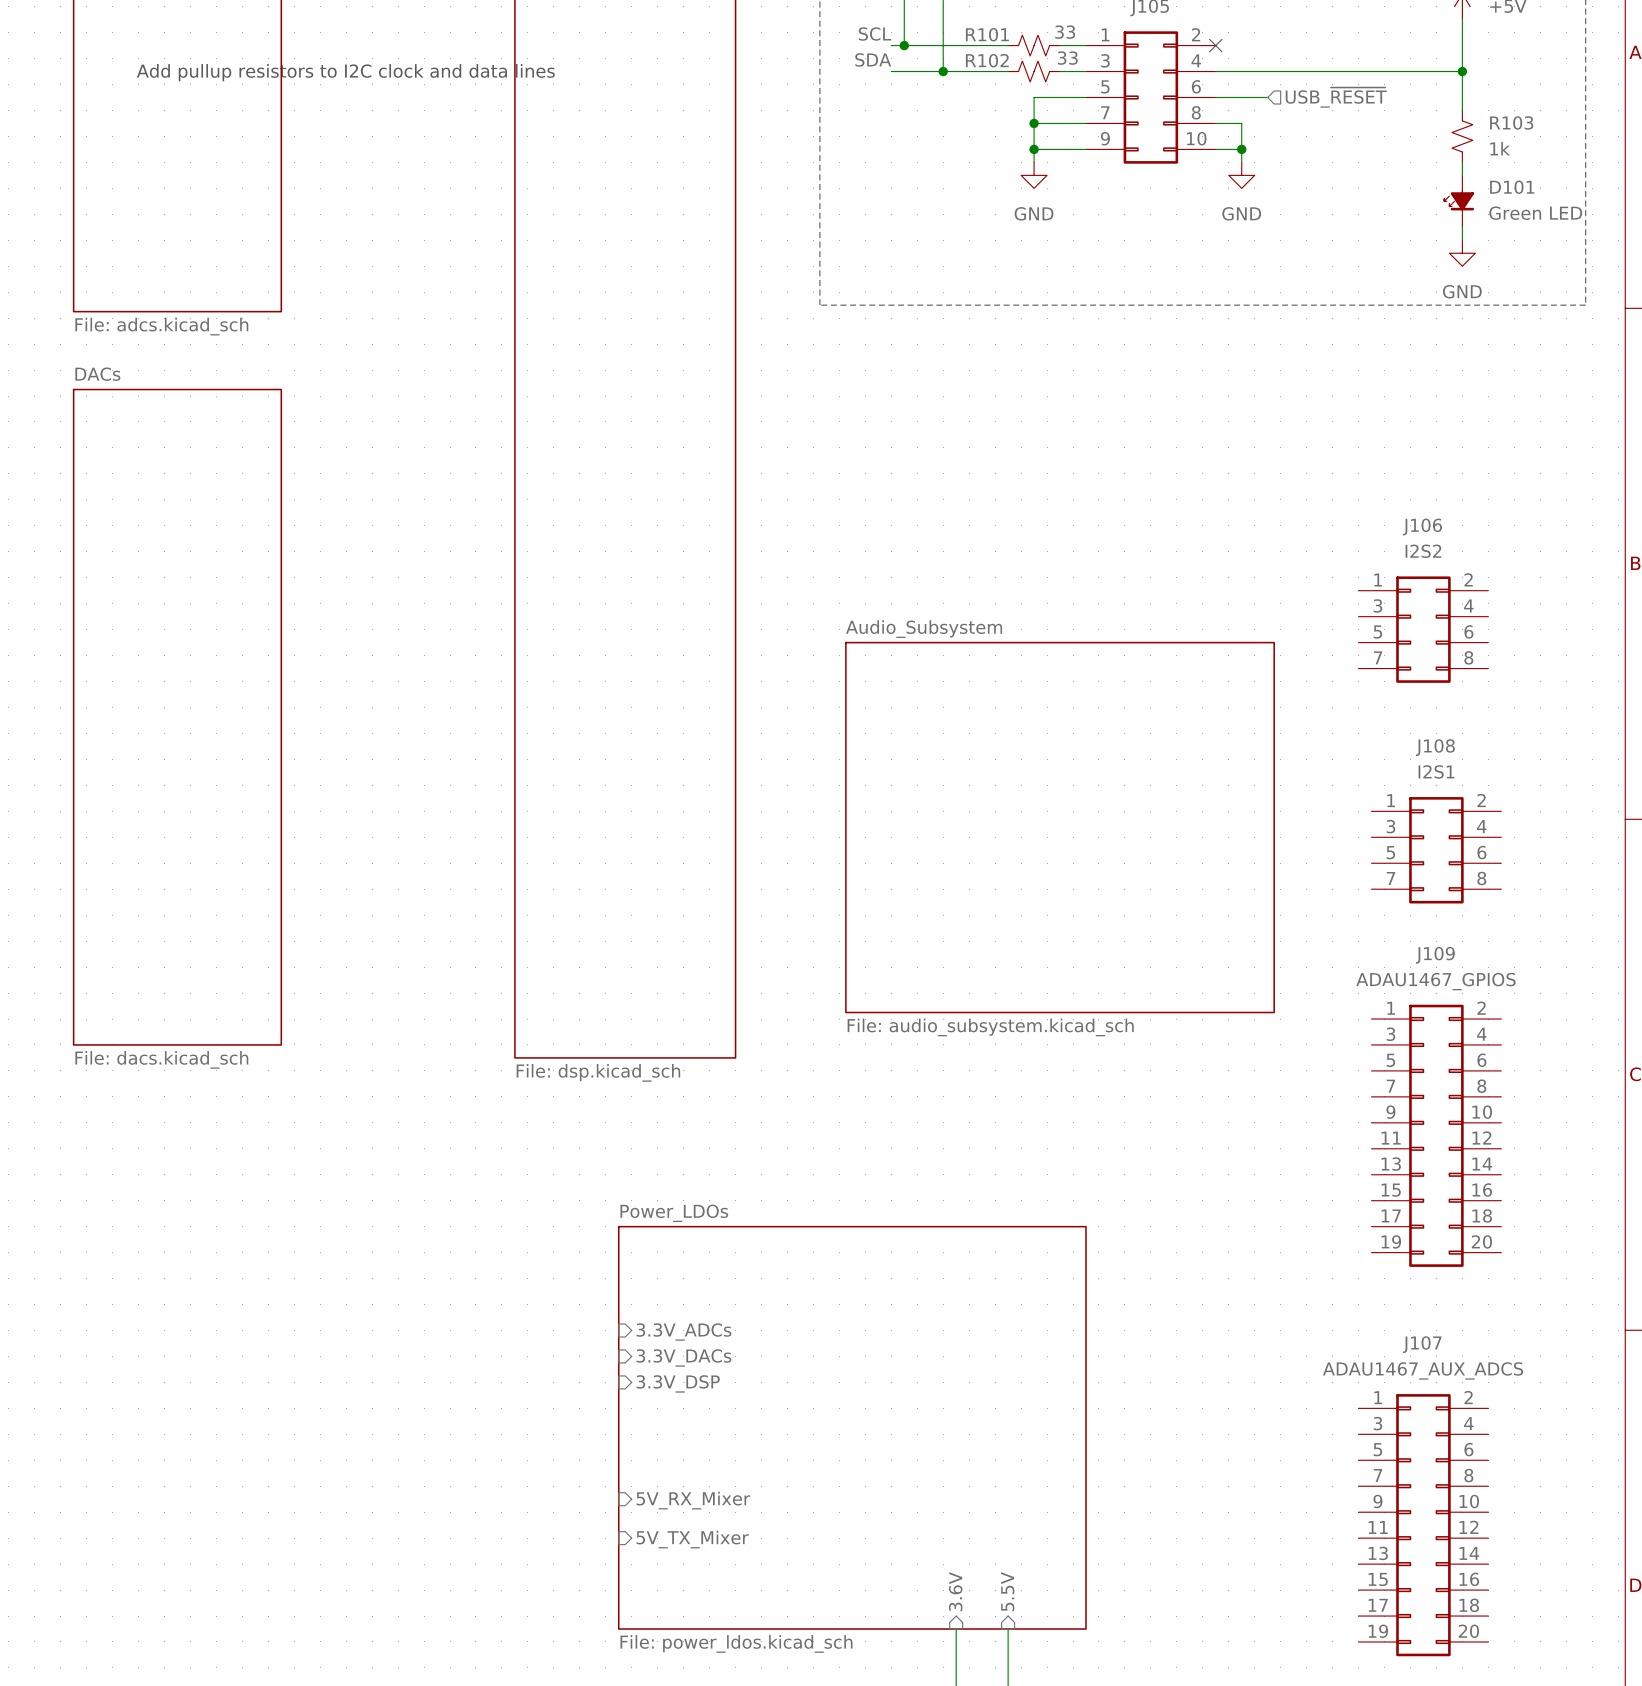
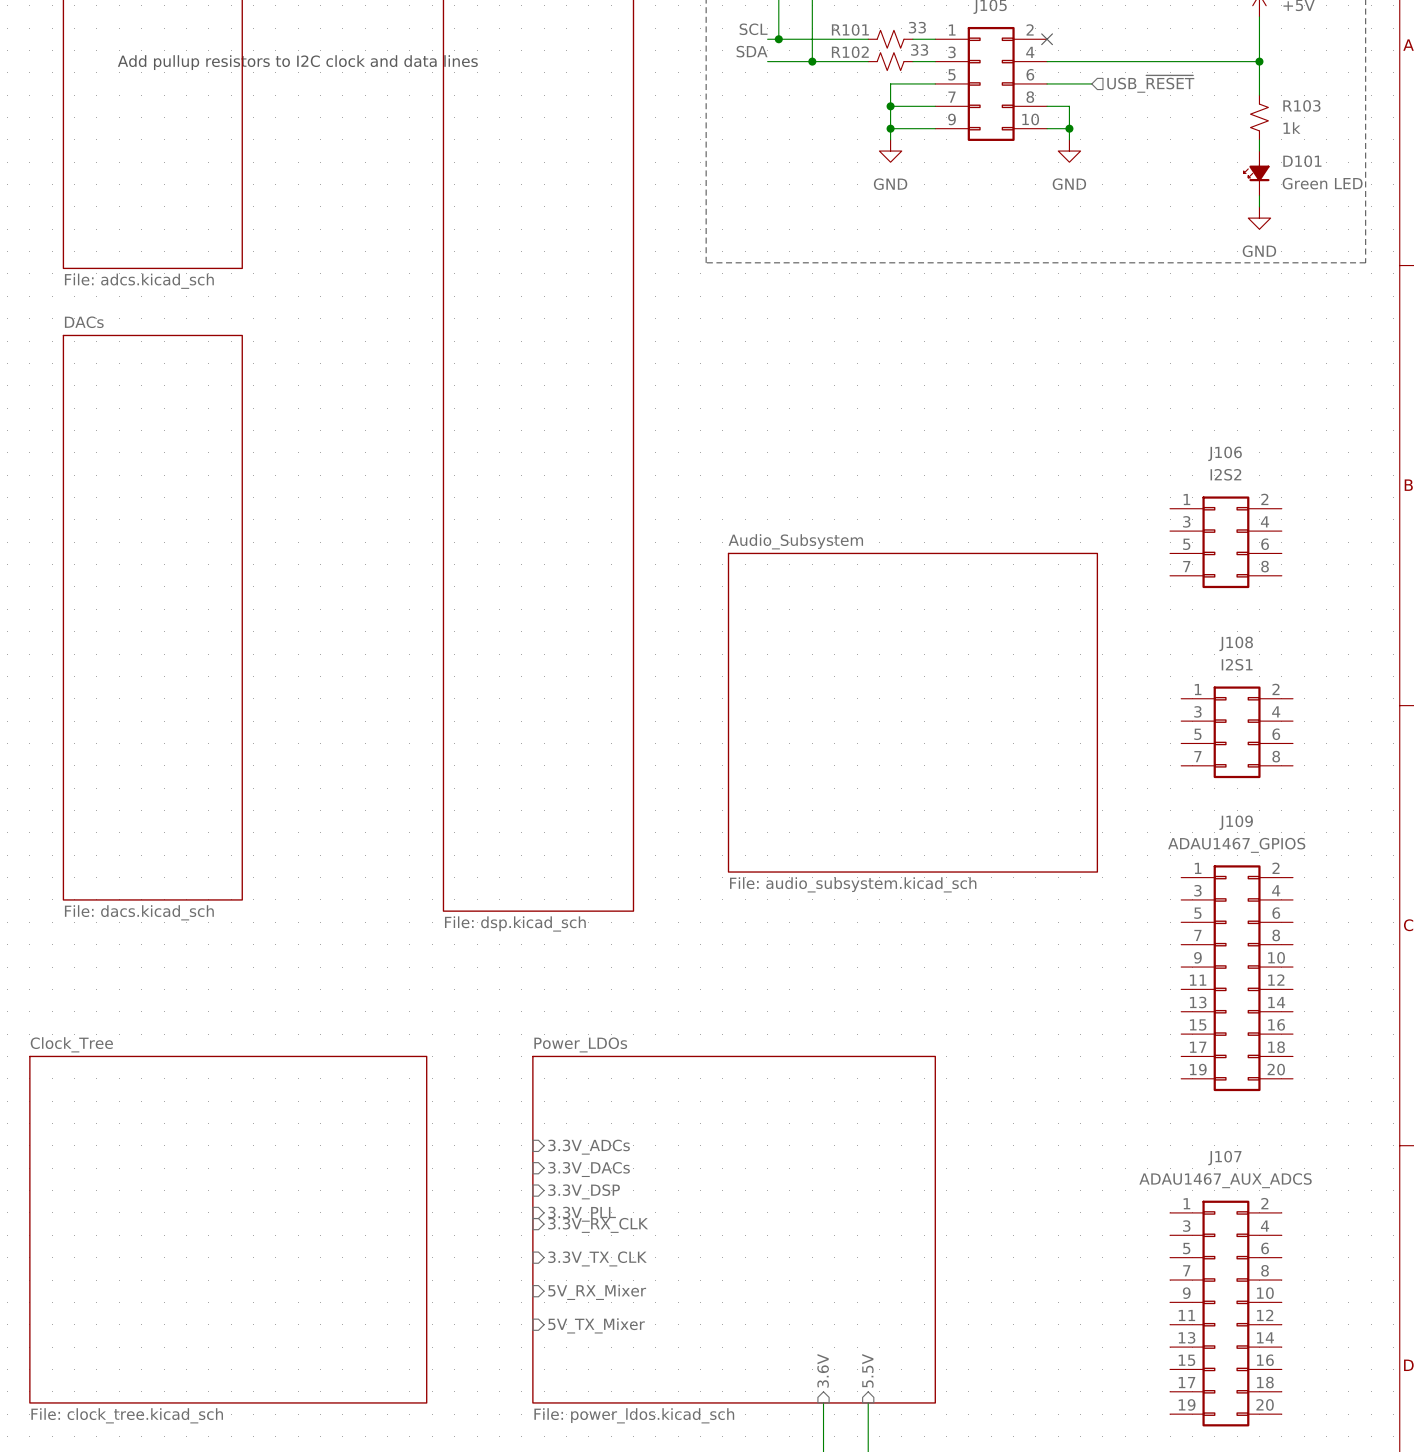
sheet pin: none -> 3.3V_PLL (582, 1214)
sheet pin: none -> 3.3V_RX_CLK (598, 1225)
sheet Clock_Tree: none -> File: clock_tree.kicad_sch (228, 1229)
sheet pin: none -> 3.3V_TX_CLK (597, 1258)

